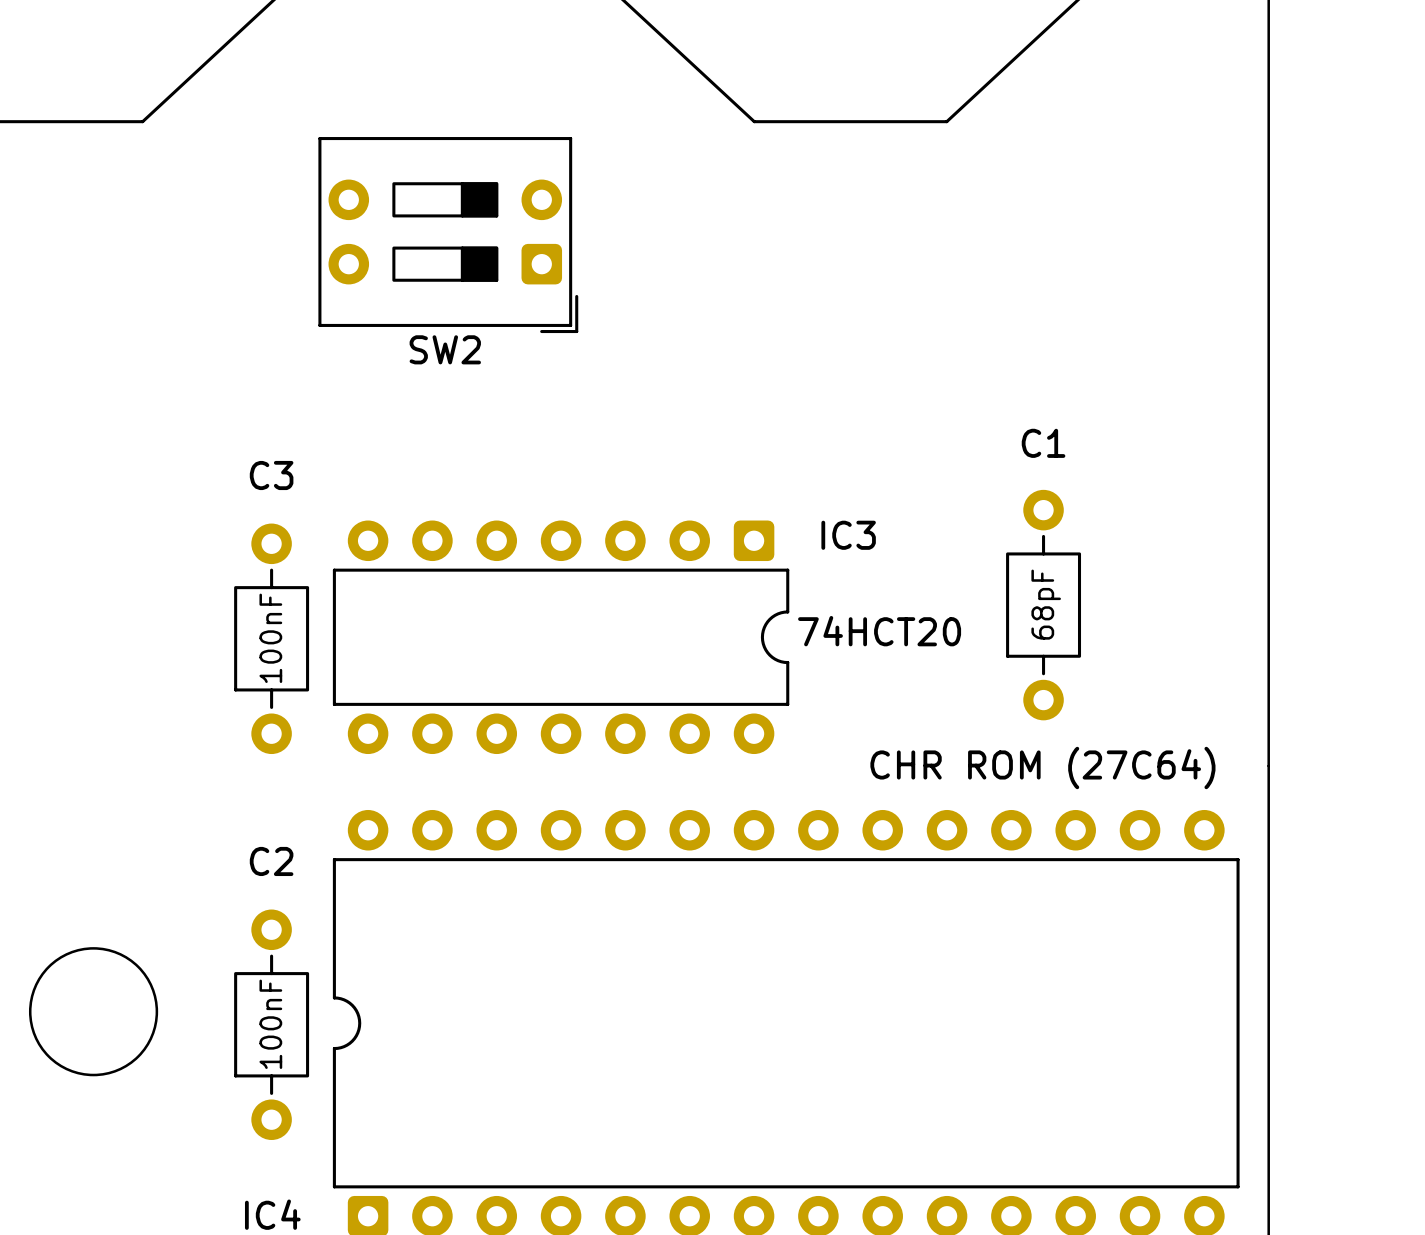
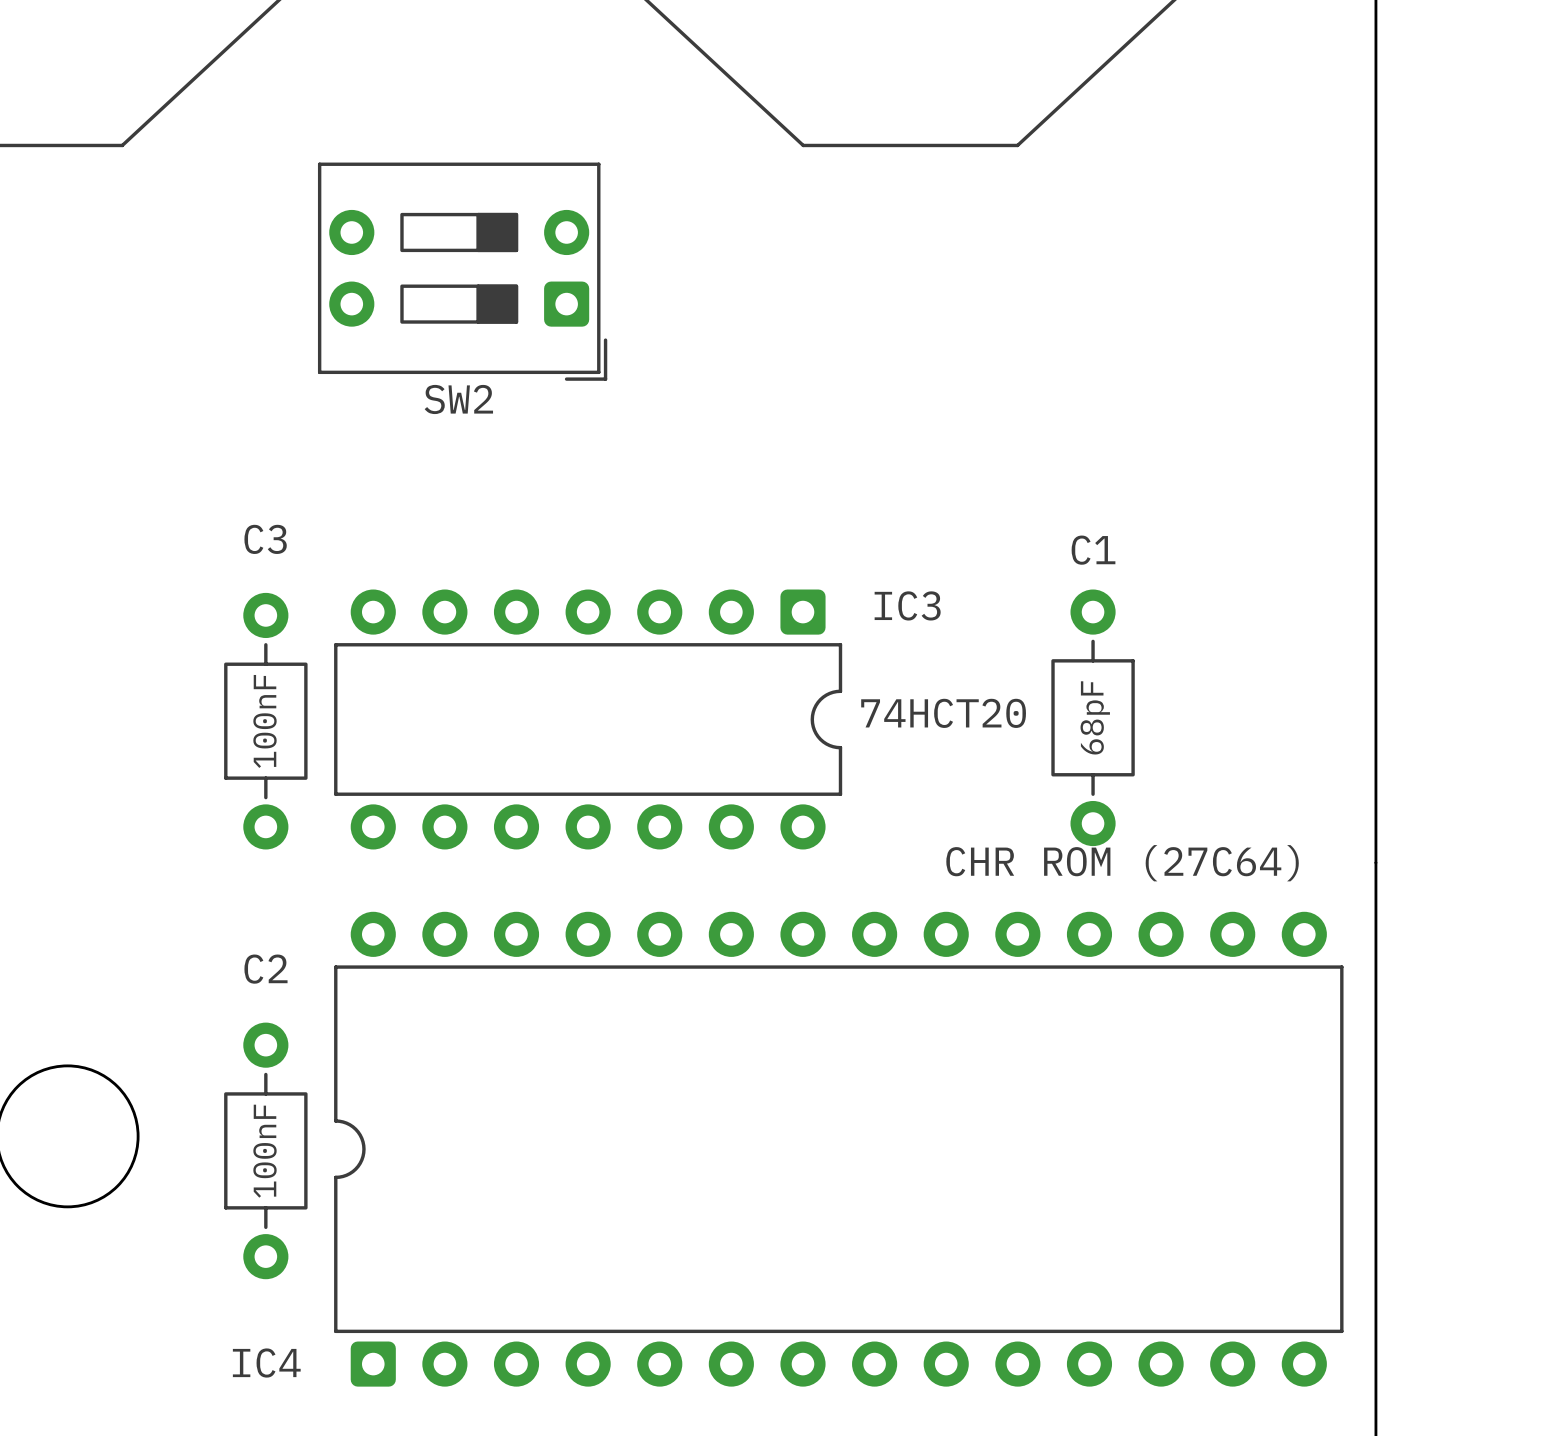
C1 name position: C1 (1043, 443) -> C1 (1093, 550)
C1 position: (1043, 605) -> (1093, 717)

